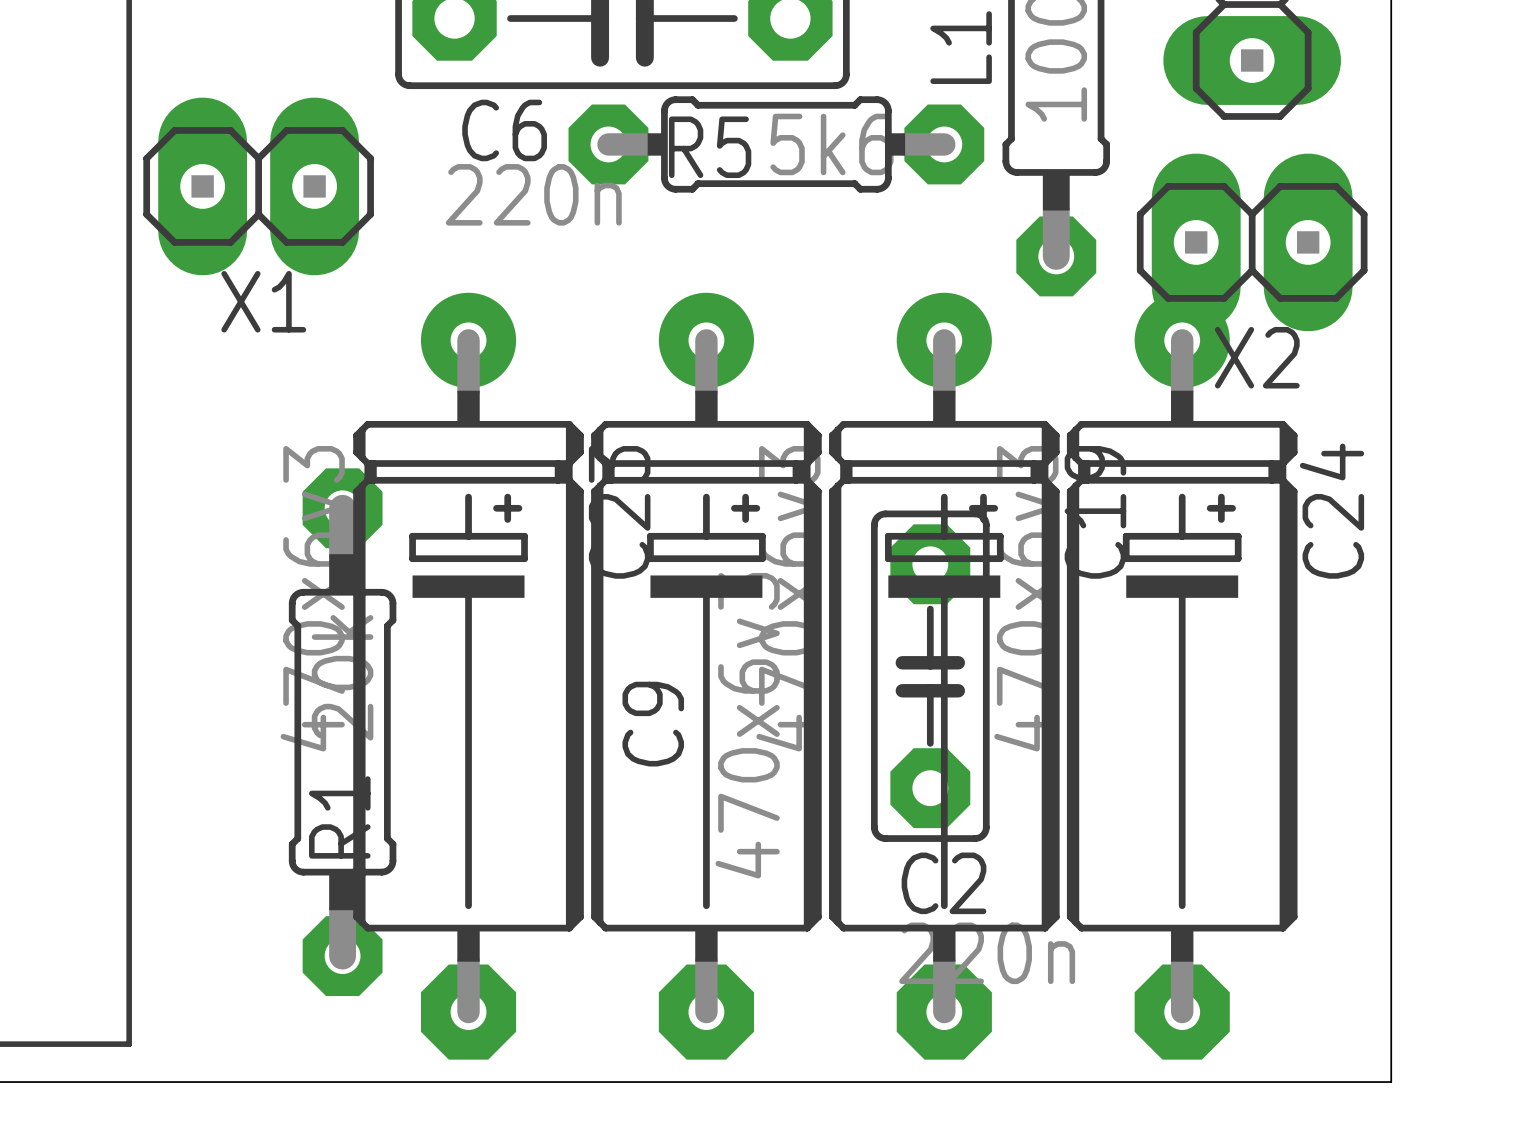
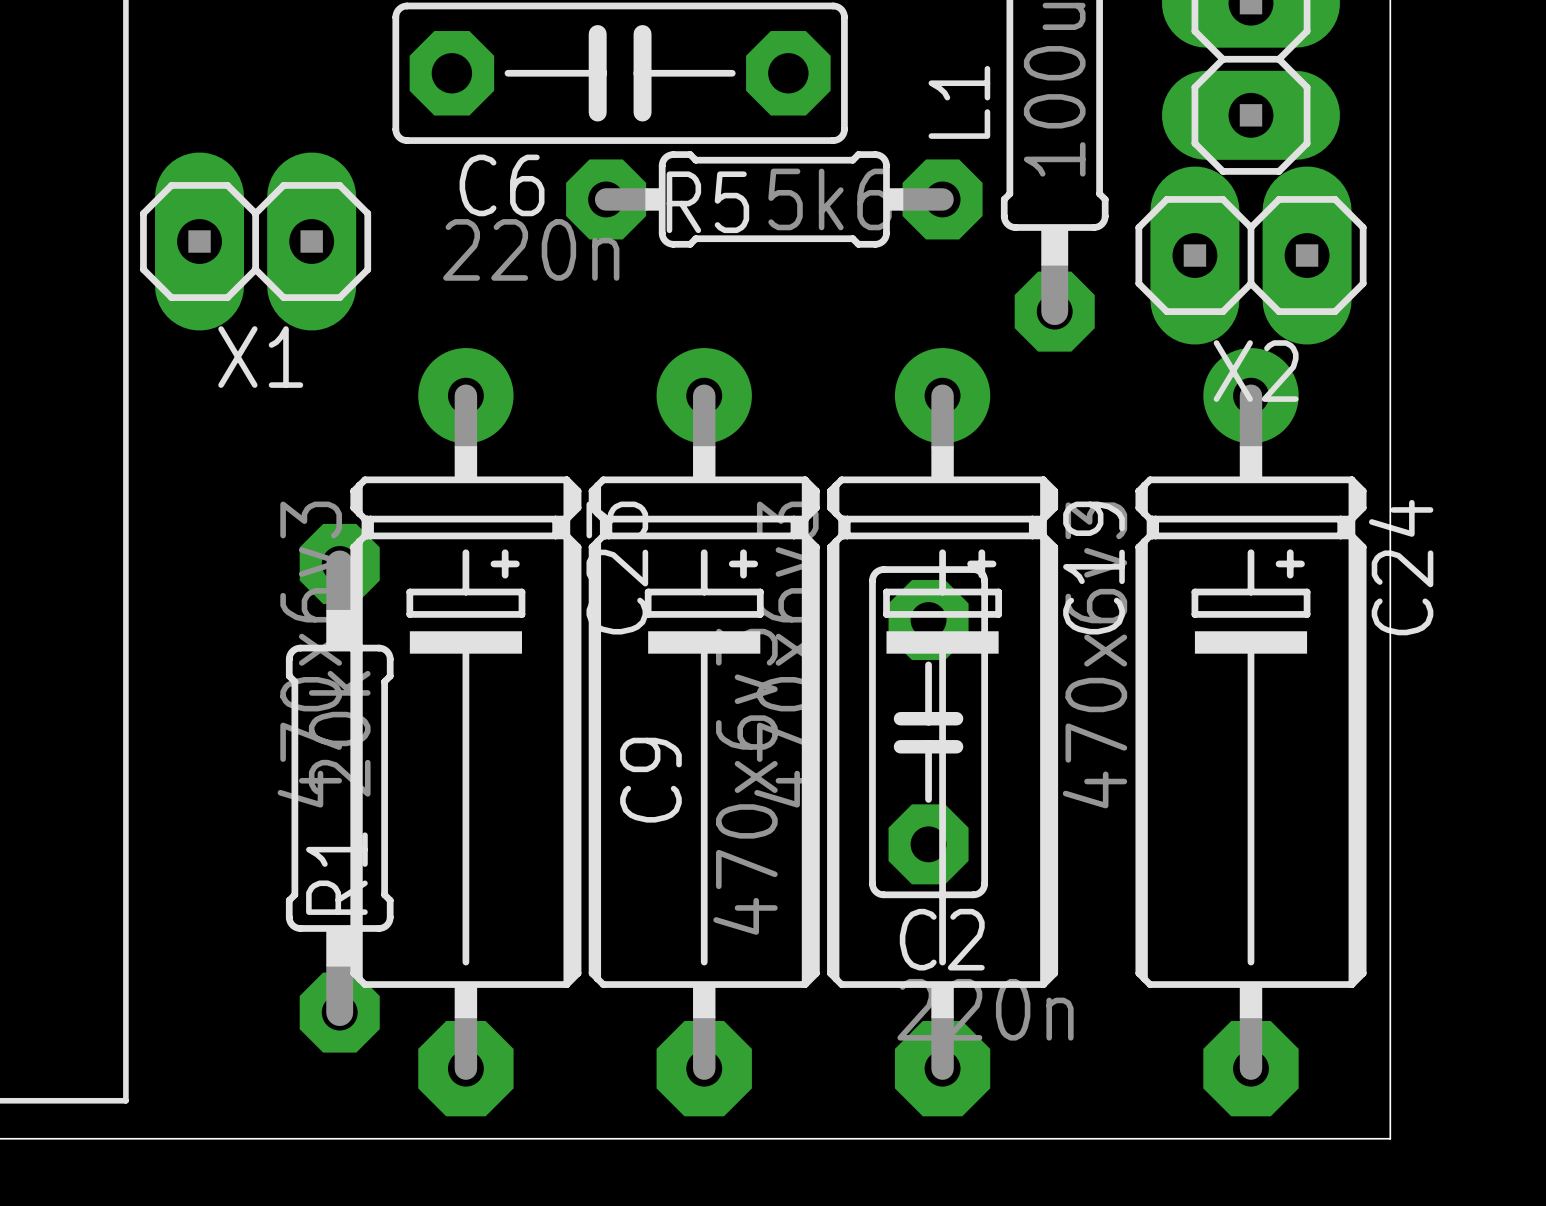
X2 position: (1252, 242) -> (1251, 255)
C24 position: (1182, 676) -> (1251, 732)

